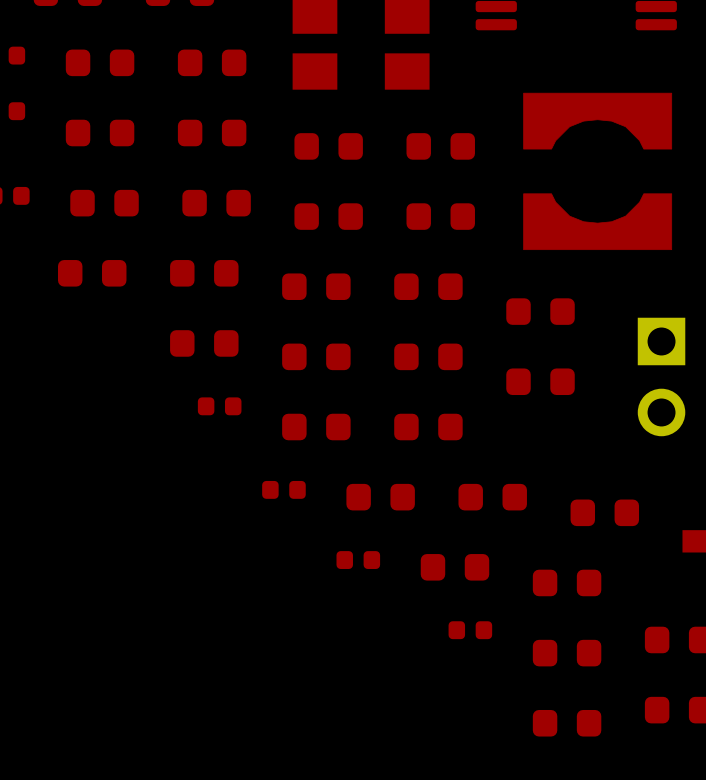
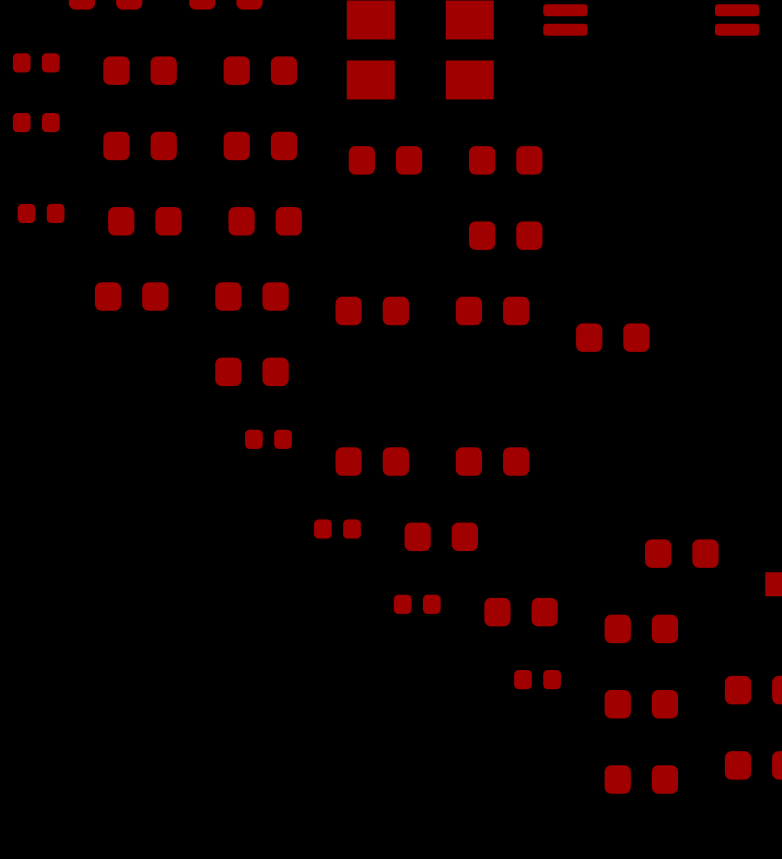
part: (597, 171) -> none
part: (328, 216) -> none
part: (316, 356) -> none
part: (428, 356) -> none
part: (661, 376) -> none
part: (540, 381) -> none
part: (492, 497) -> none

